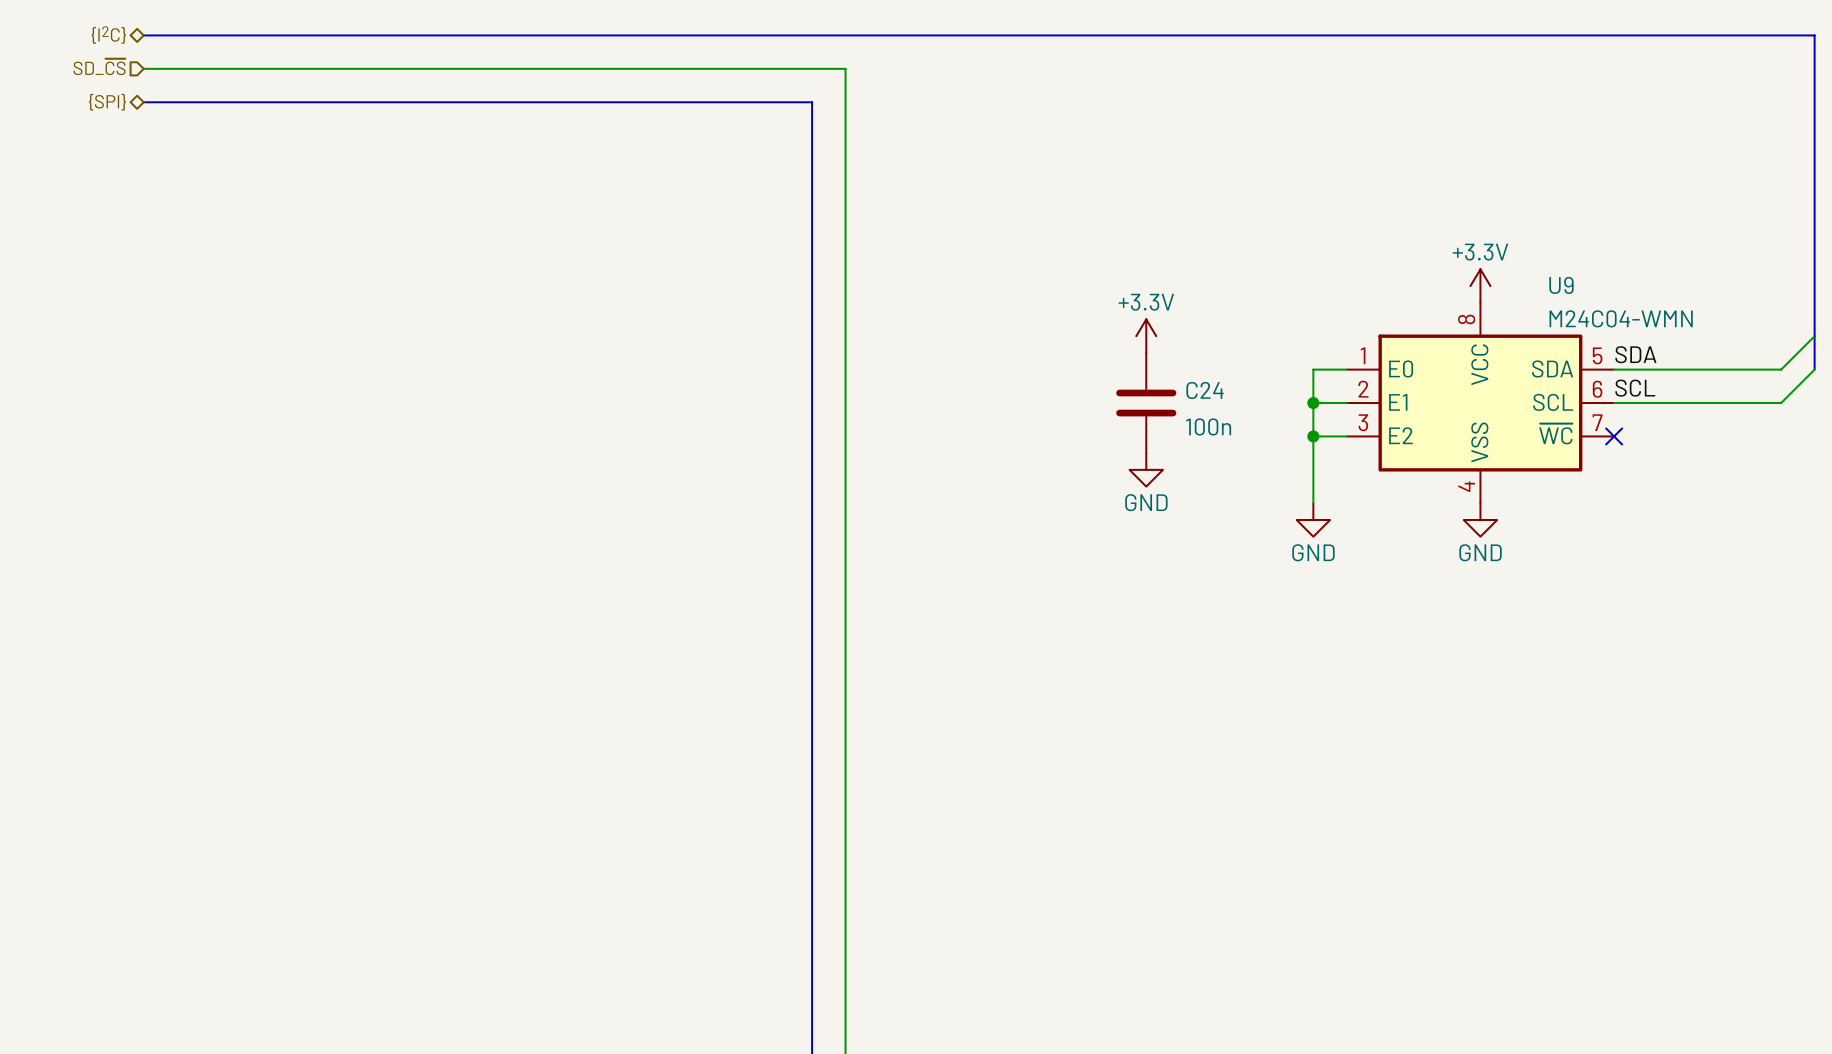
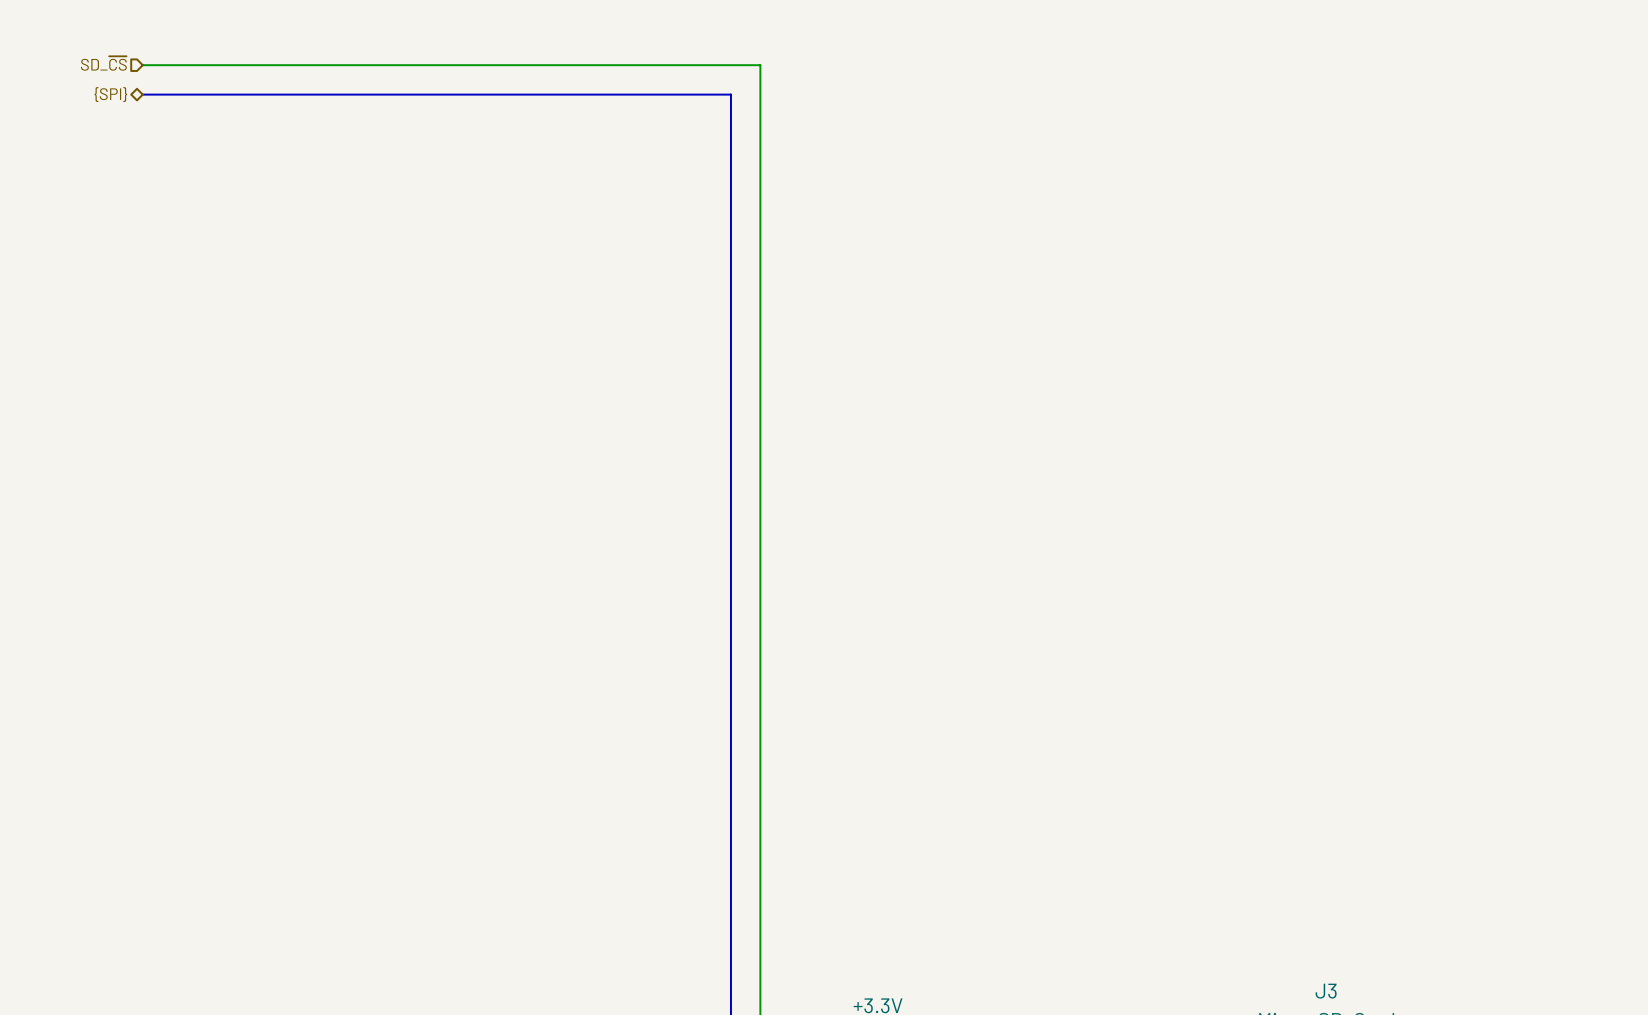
hierarchical label: {I2C} (108, 35) -> none
bus: (143, 35) (1814, 35) (1814, 369) -> none
power symbol: +3.3V (1480, 286) -> none
power symbol: +3.3V (1146, 336) -> none
wire: (1814, 336) (1781, 369) (1614, 369) -> none
label: SDA (1635, 354) -> none
wire: (1346, 369) (1313, 369) (1313, 503) -> none
wire: (1814, 369) (1781, 403) (1614, 403) -> none
label: SCL (1635, 388) -> none
C24: 100n (1146, 403) -> none
wire: (1313, 403) (1346, 403) -> none
junction: (1313, 403) -> none
U9: M24C04-WMN (1480, 403) -> none
wire: (1313, 436) (1346, 436) -> none
junction: (1313, 436) -> none
no-connect mark: (1614, 436) -> none
power symbol: GND (1146, 469) -> none
power symbol: GND (1313, 519) -> none
power symbol: GND (1480, 519) -> none

